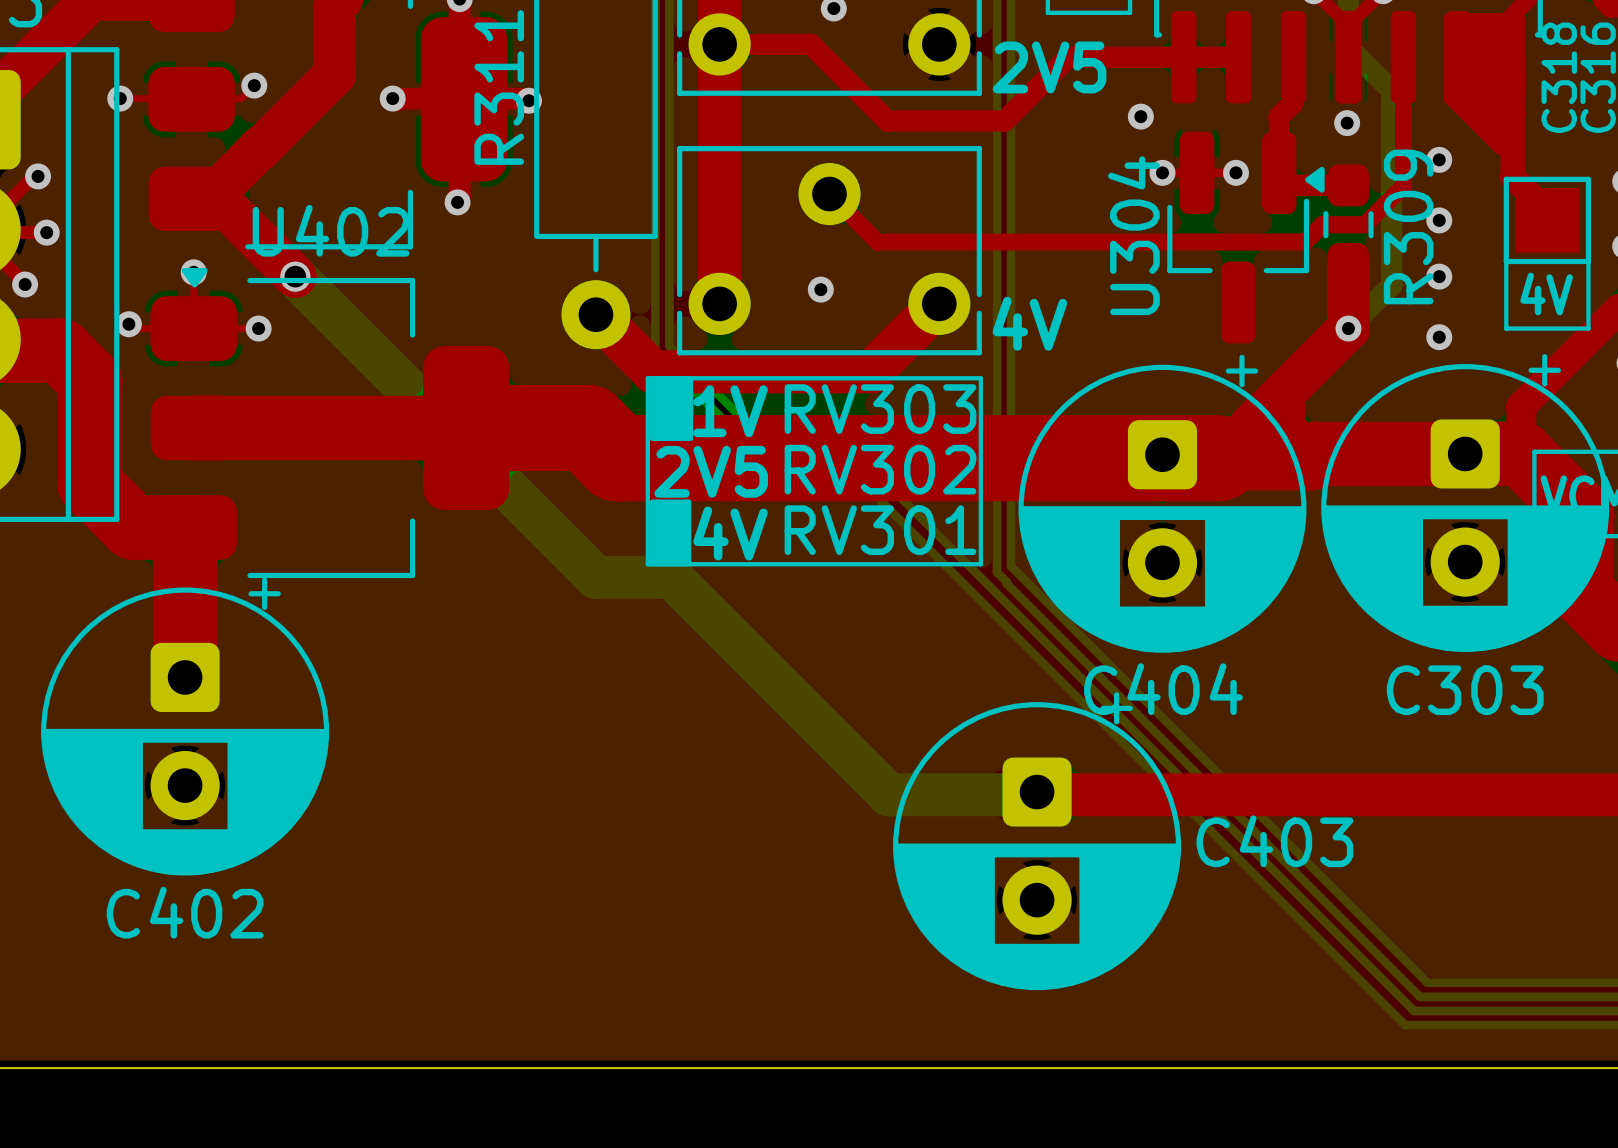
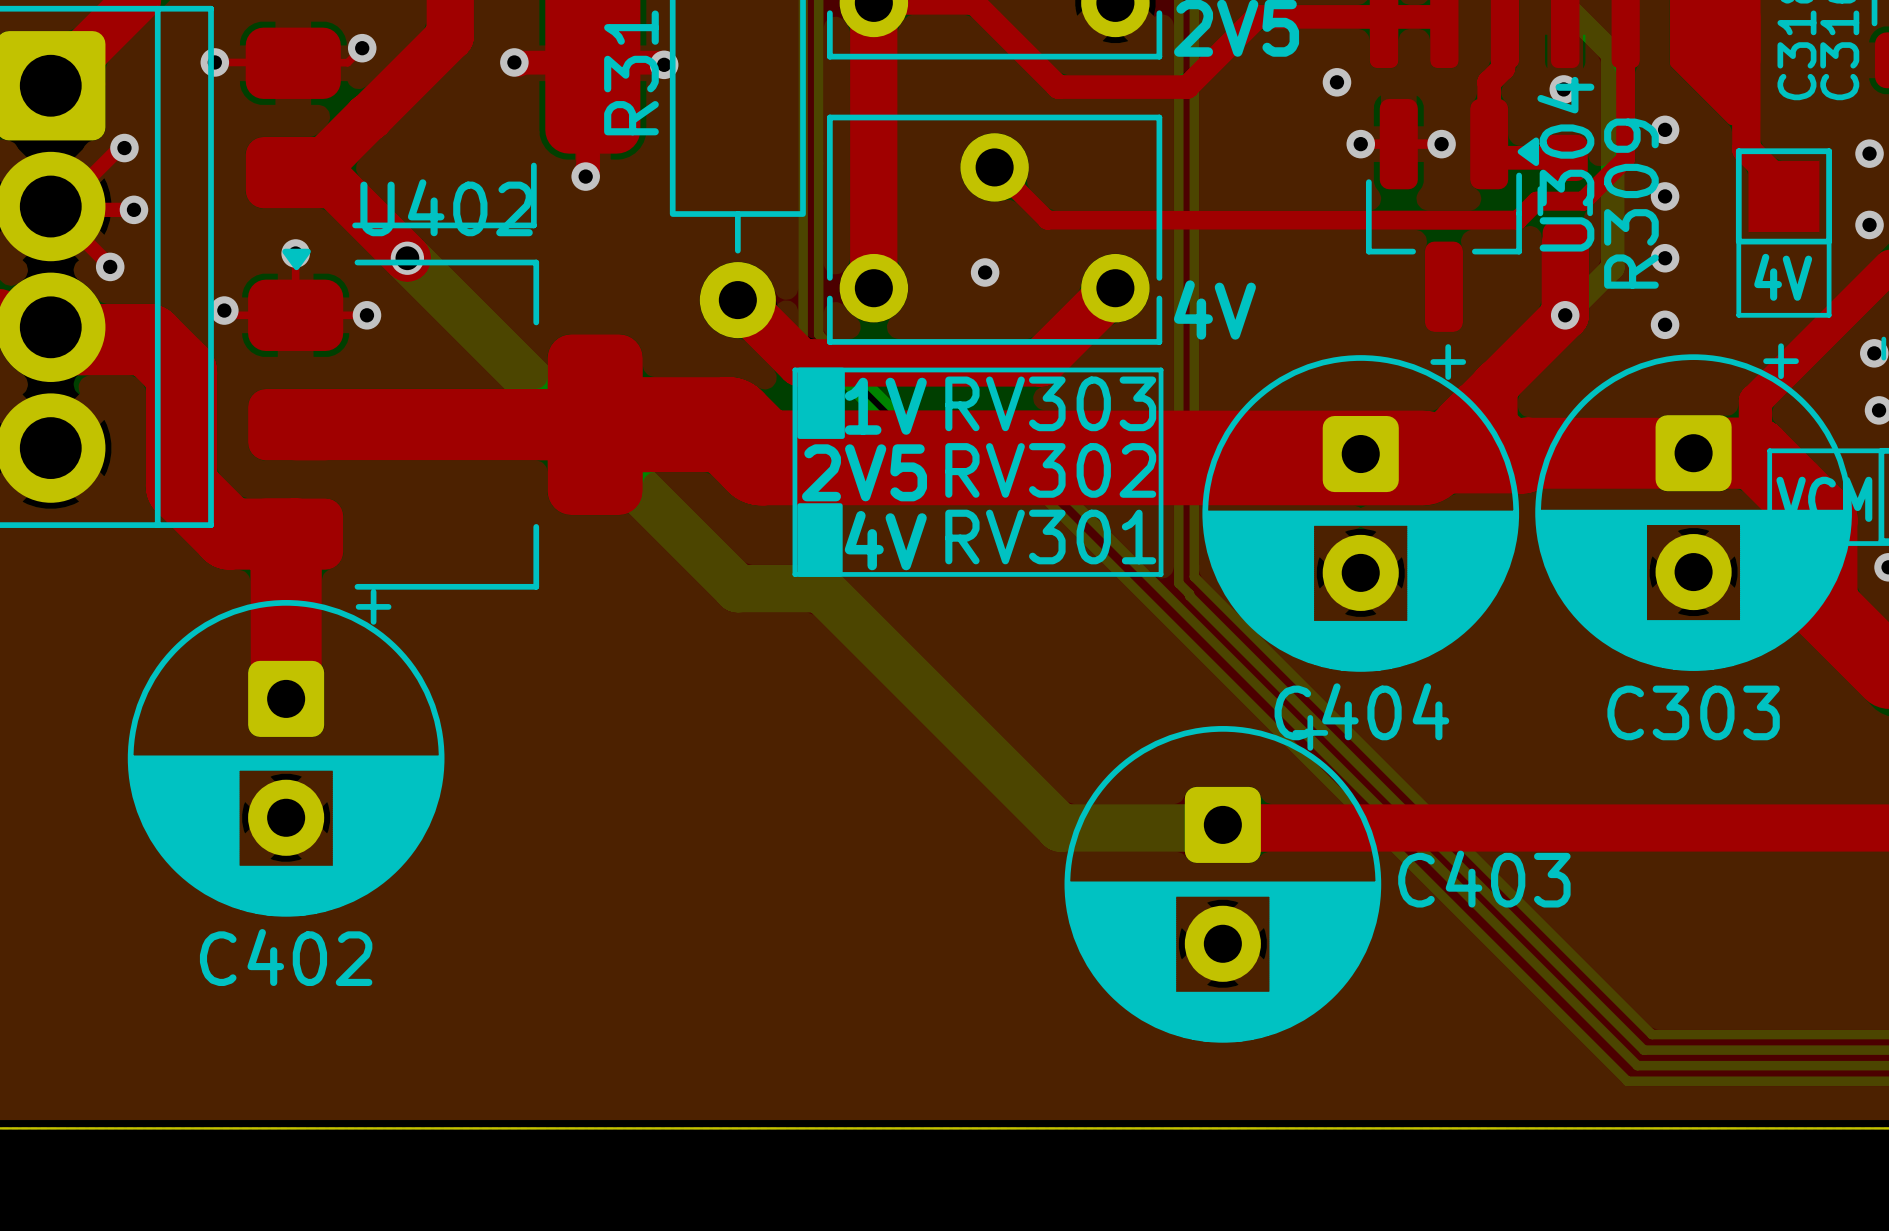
U304 name position: U304 (1133, 235) -> U304 (1565, 164)

